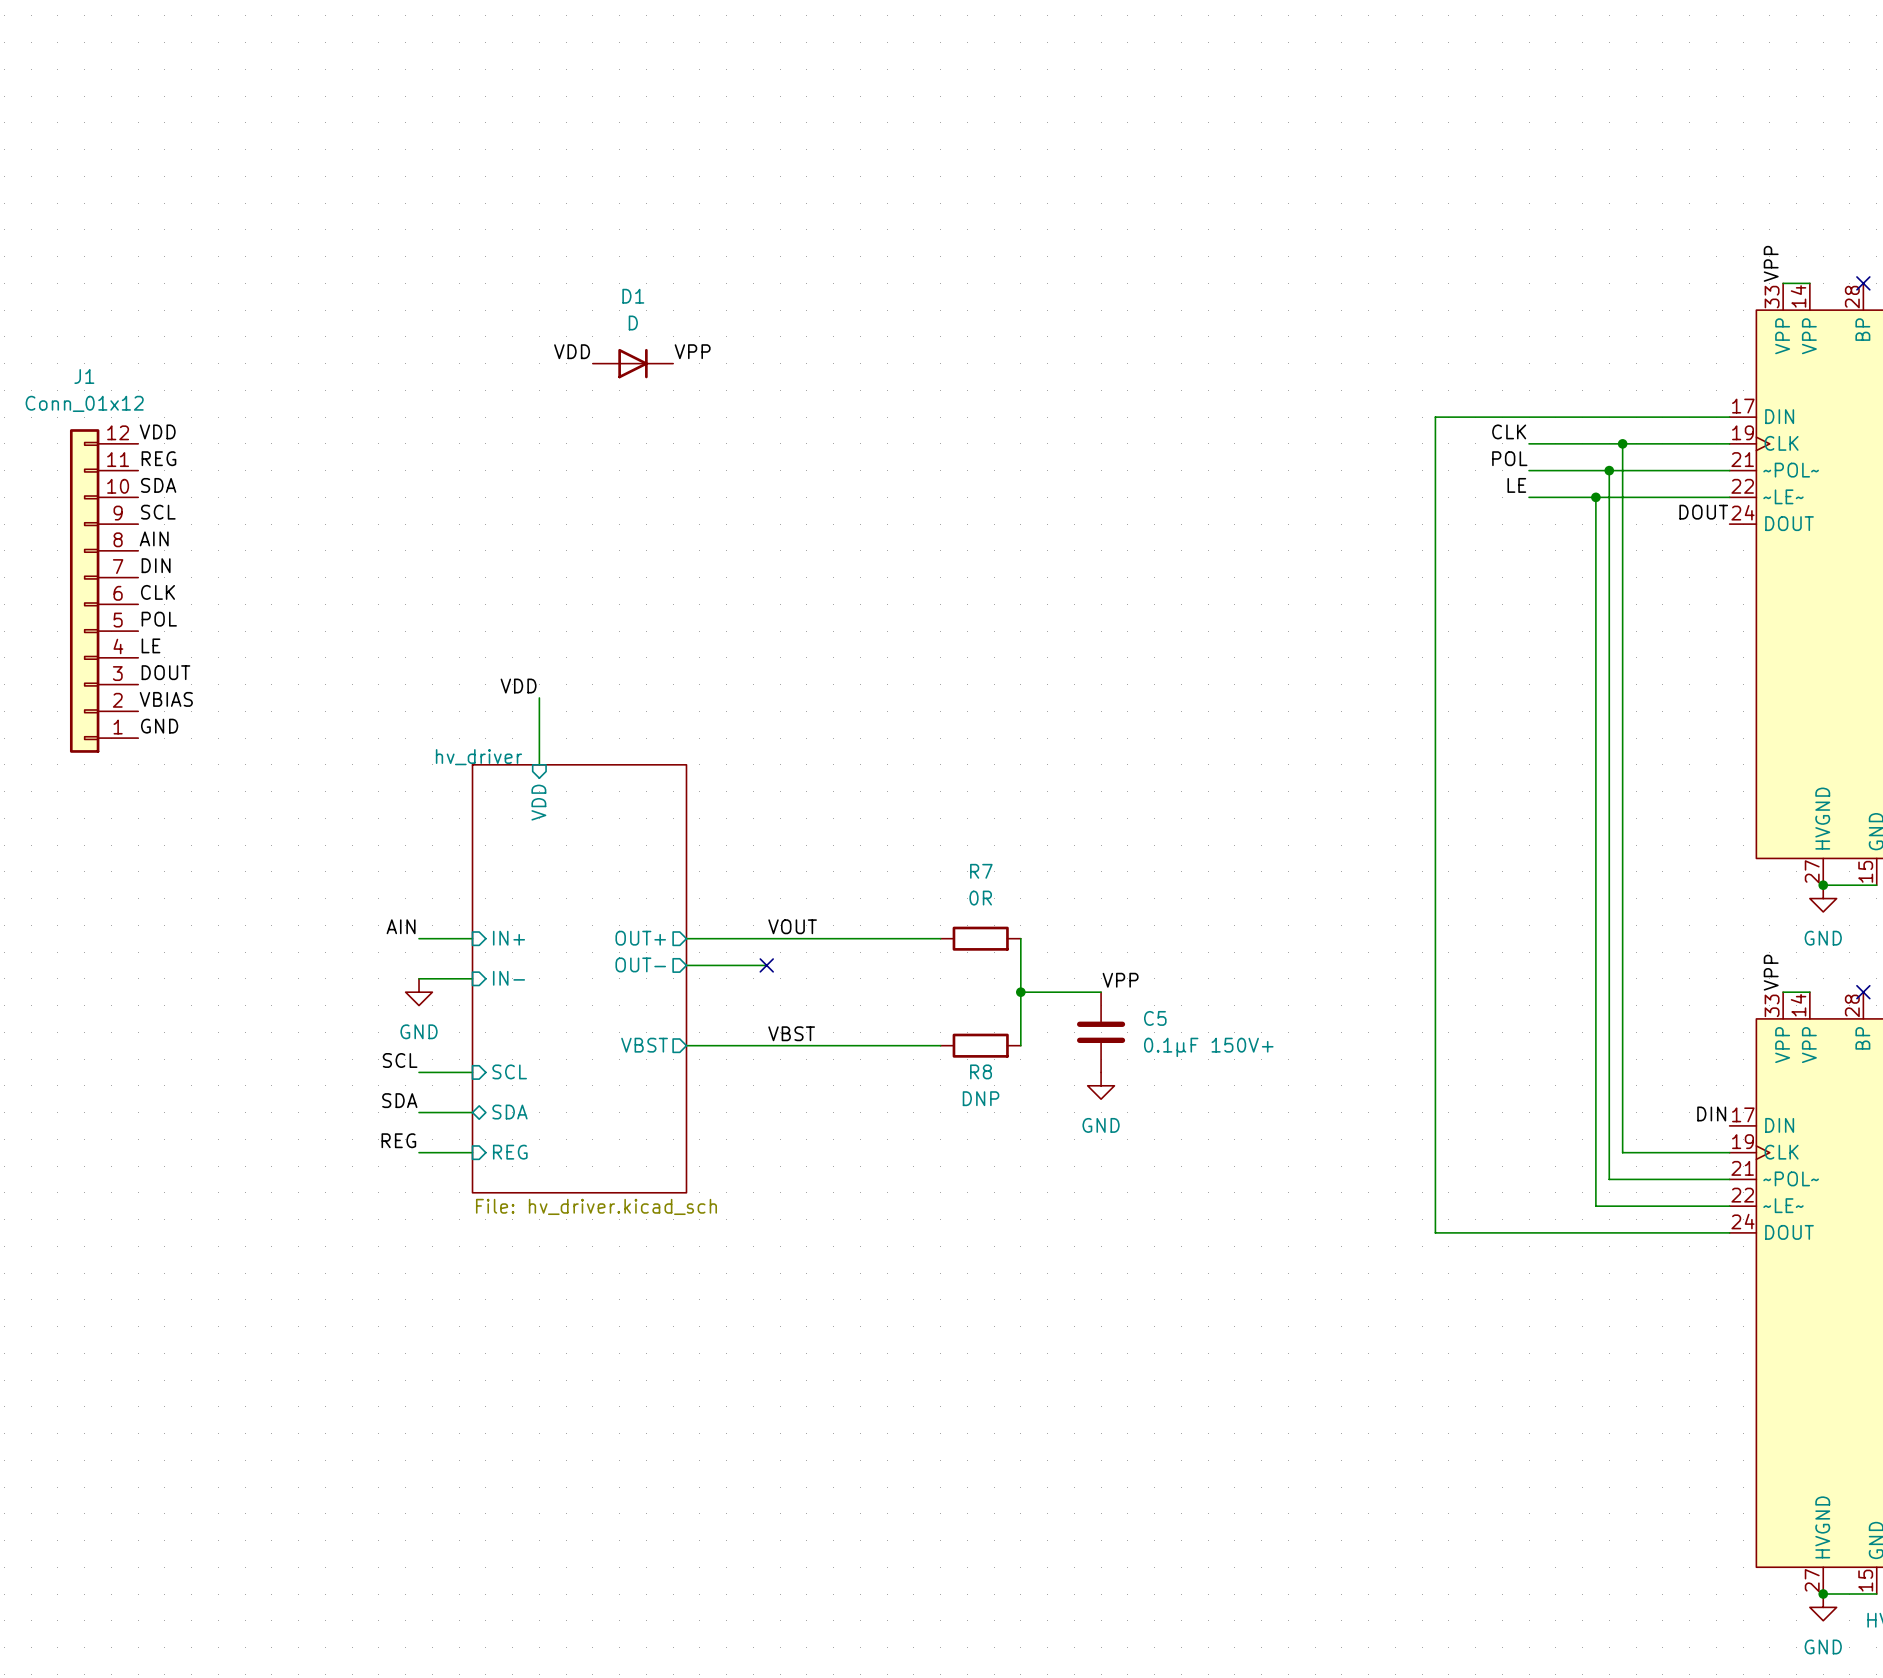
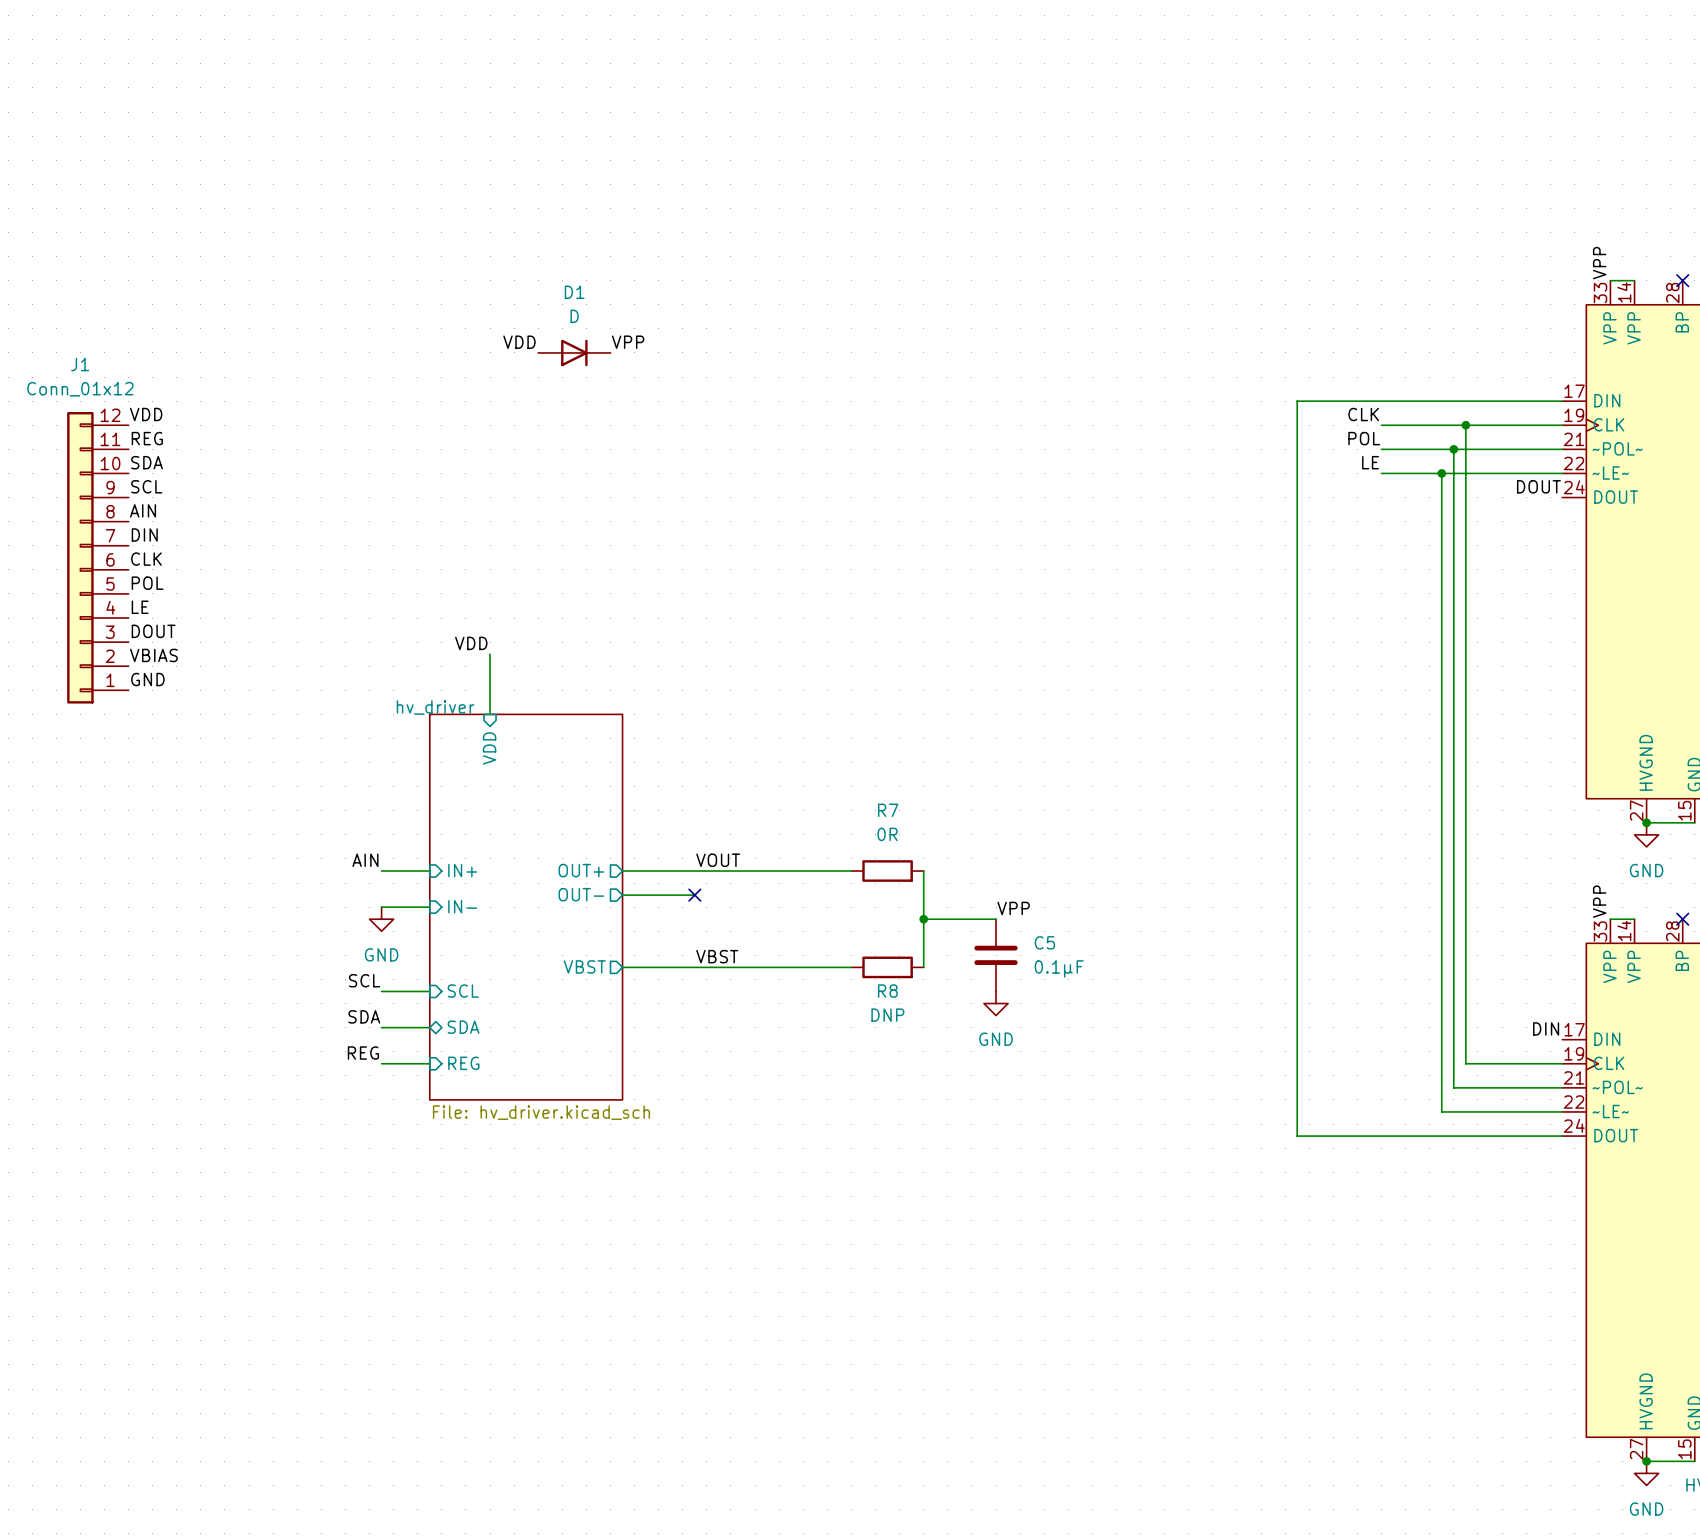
C5 value: 0.1µF 150V+ (1208, 1047) -> 0.1µF (1059, 968)

